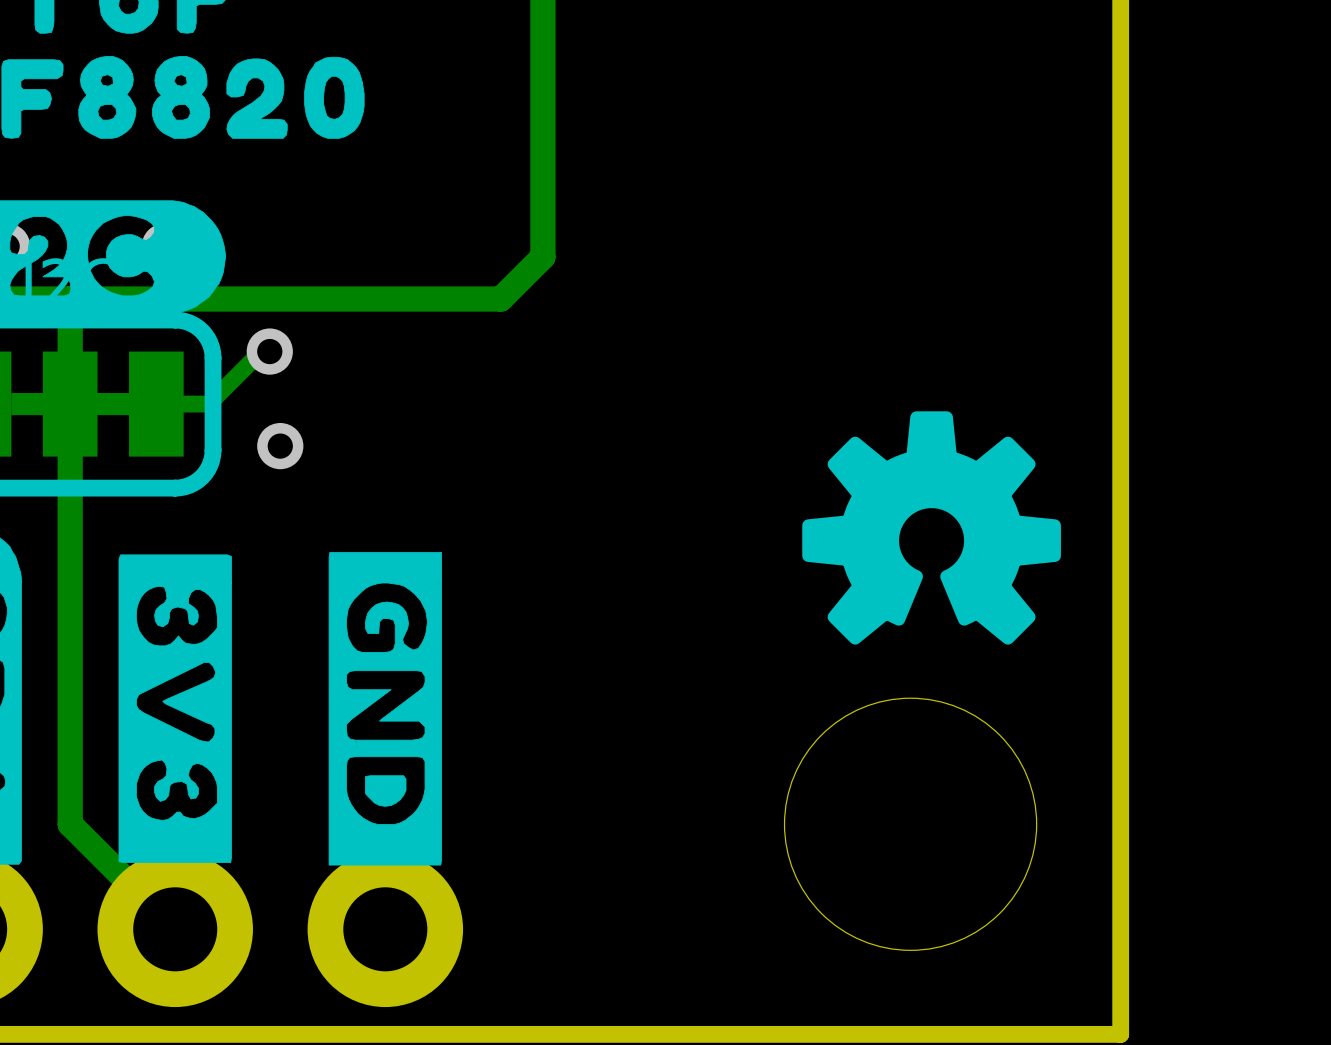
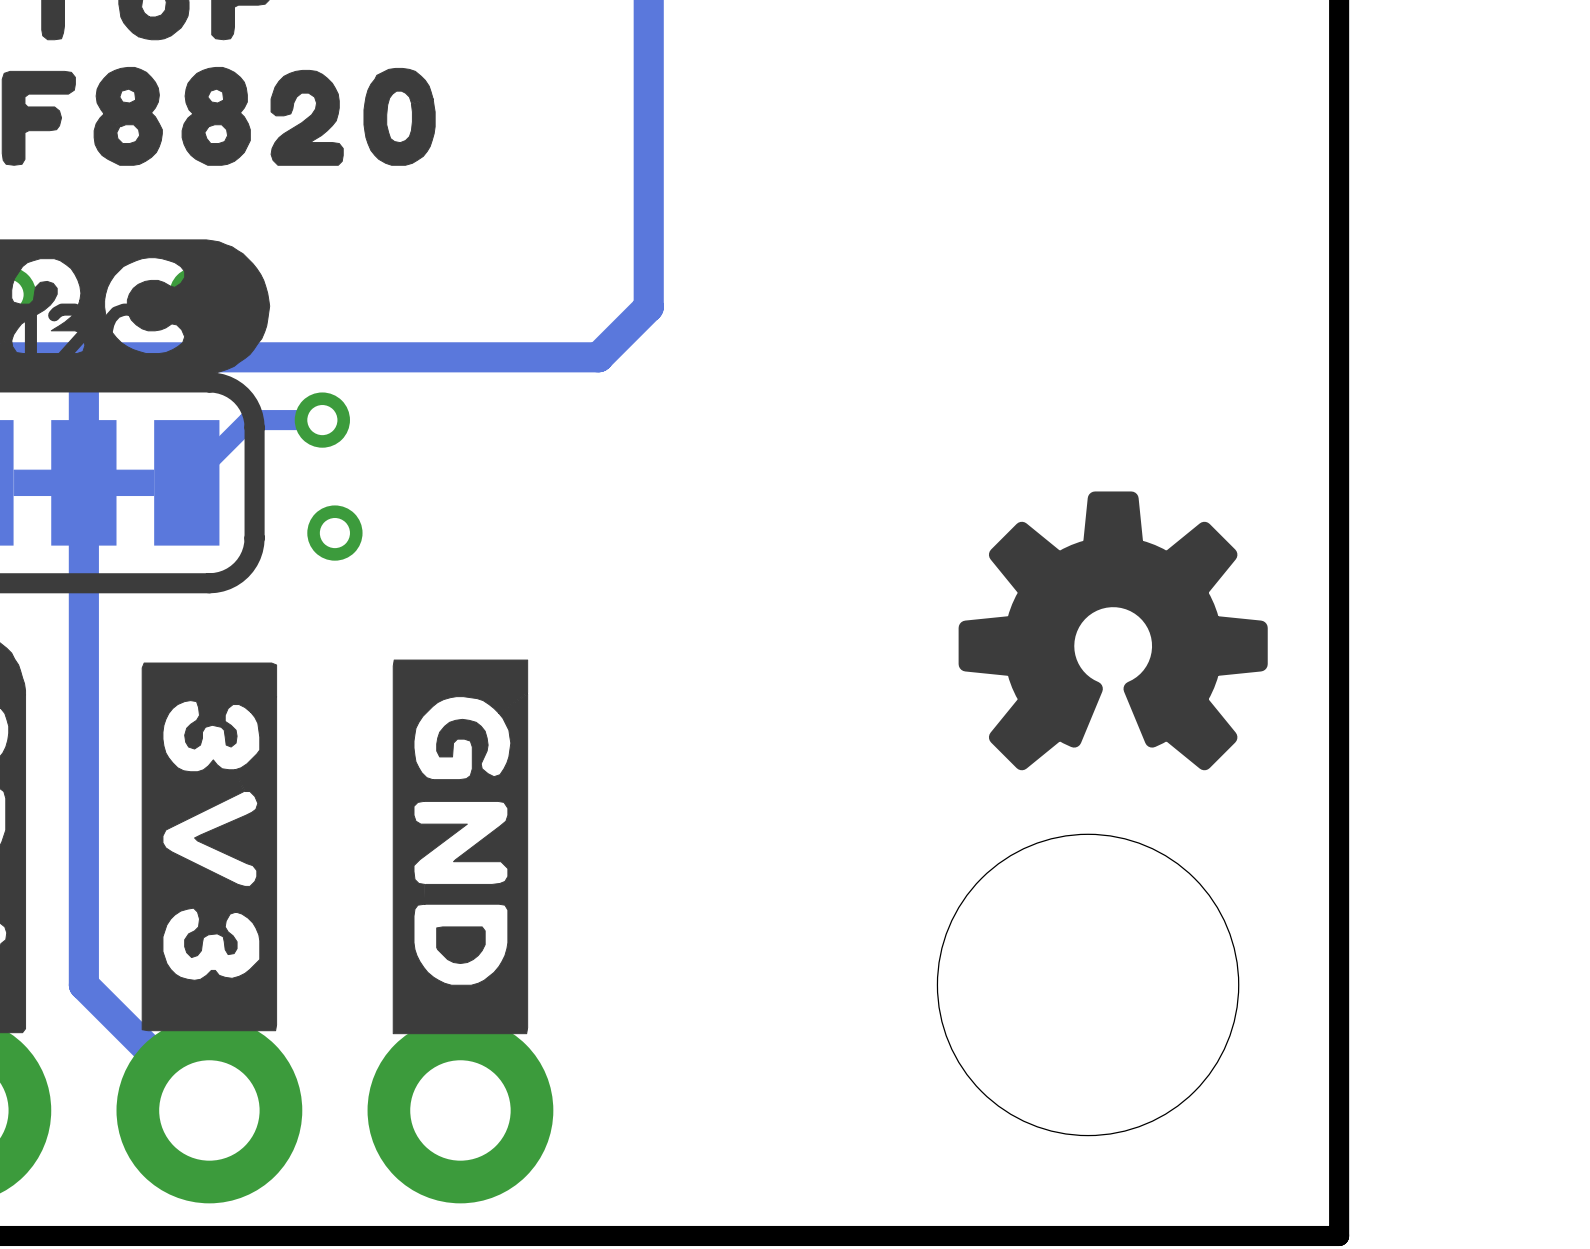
track: (261, 351) (208, 404) (156, 404) -> (312, 420) (249, 420) (186, 482)

